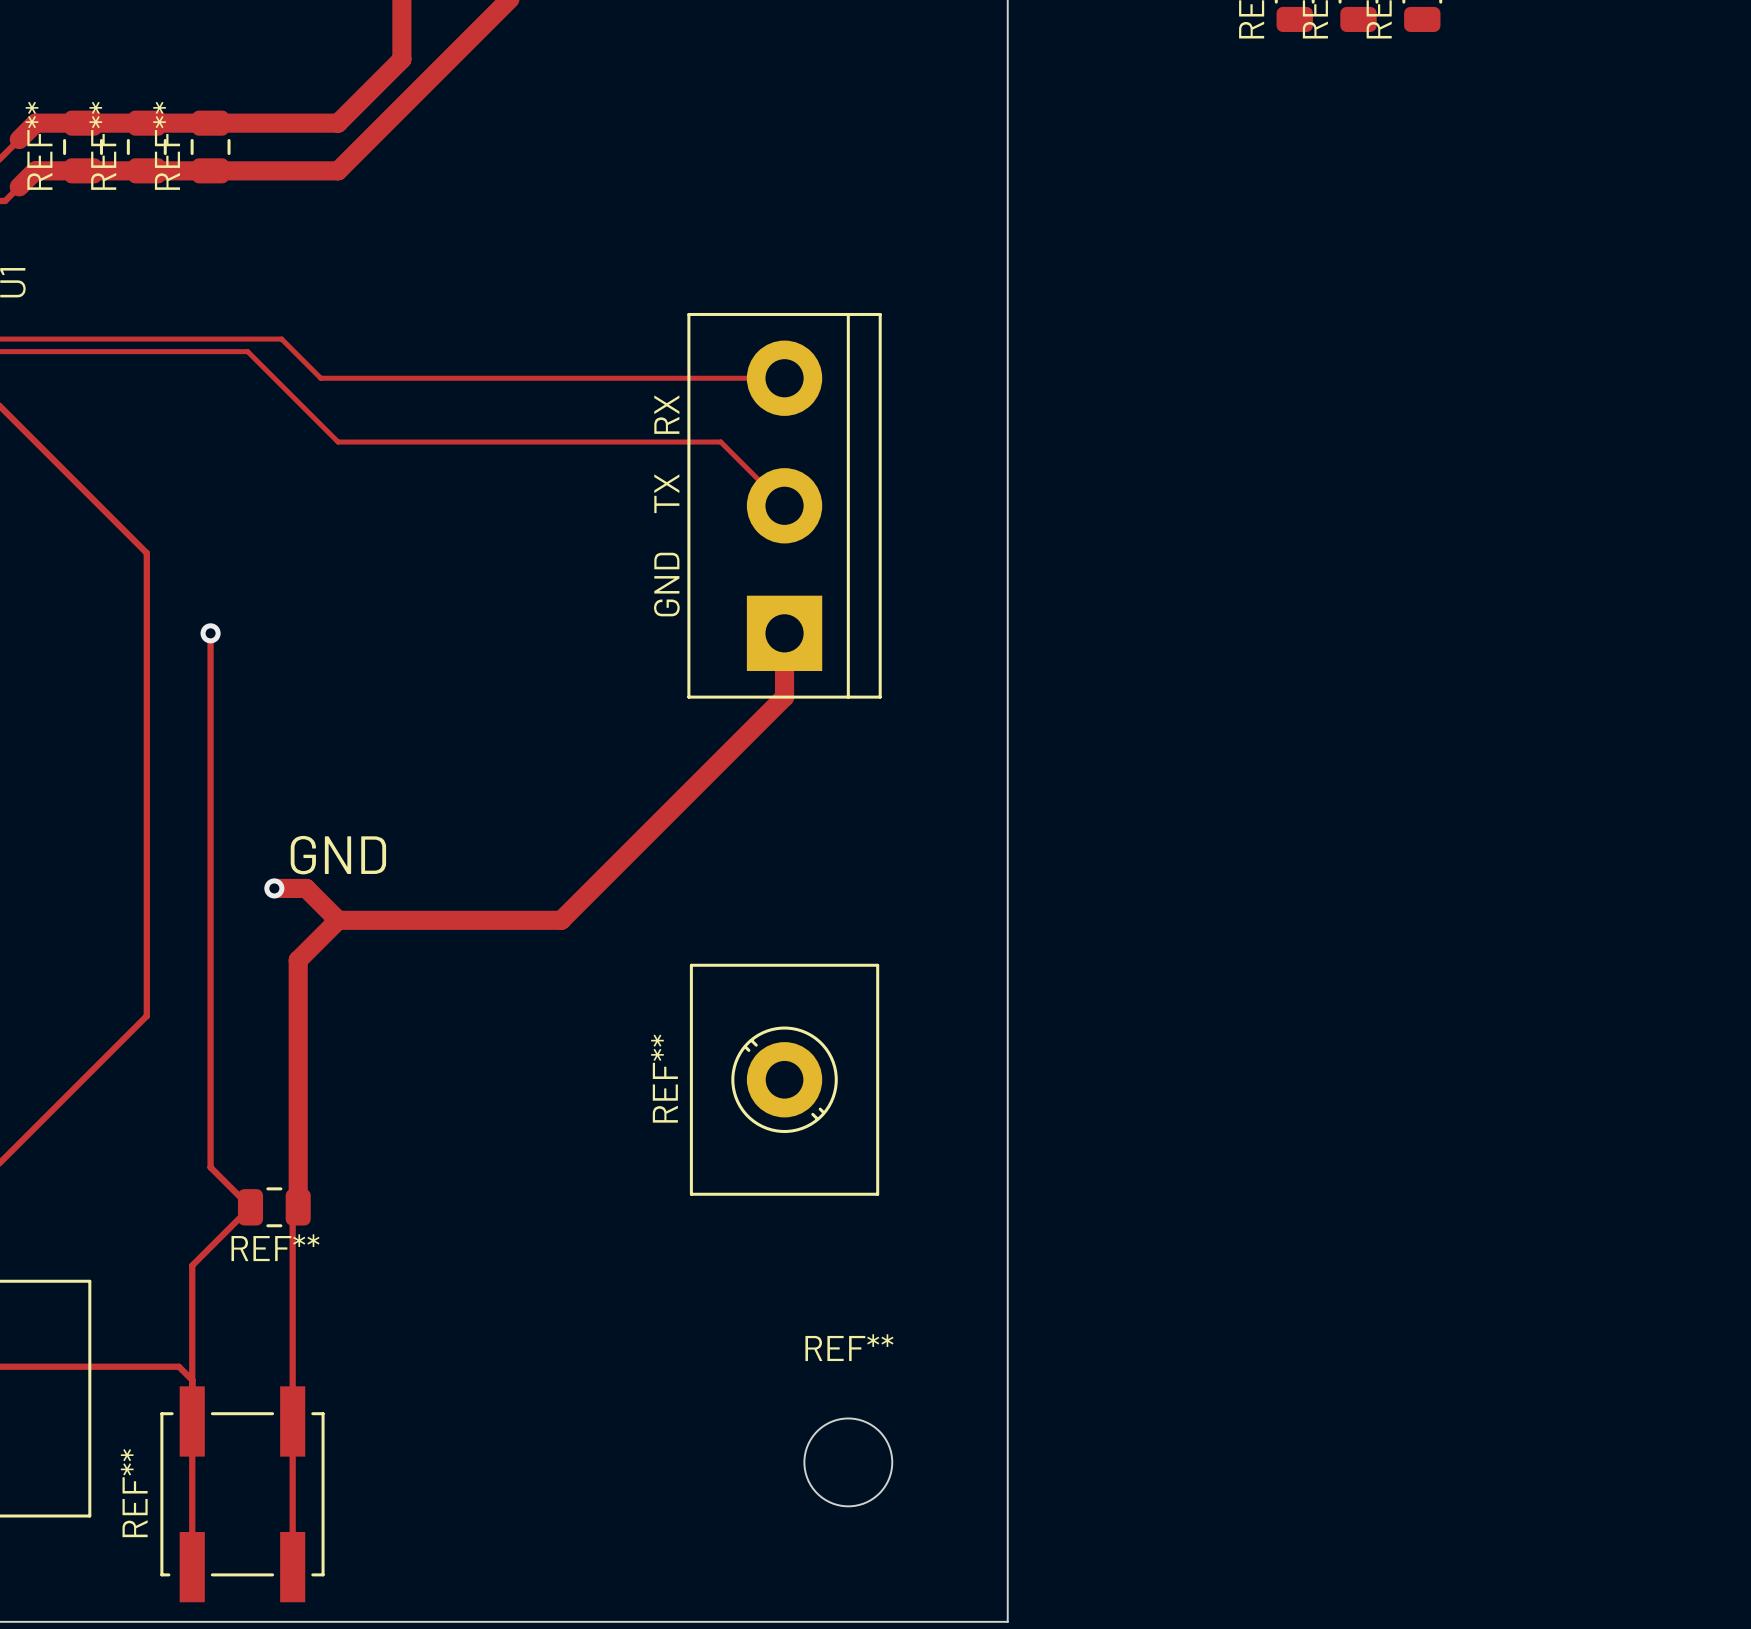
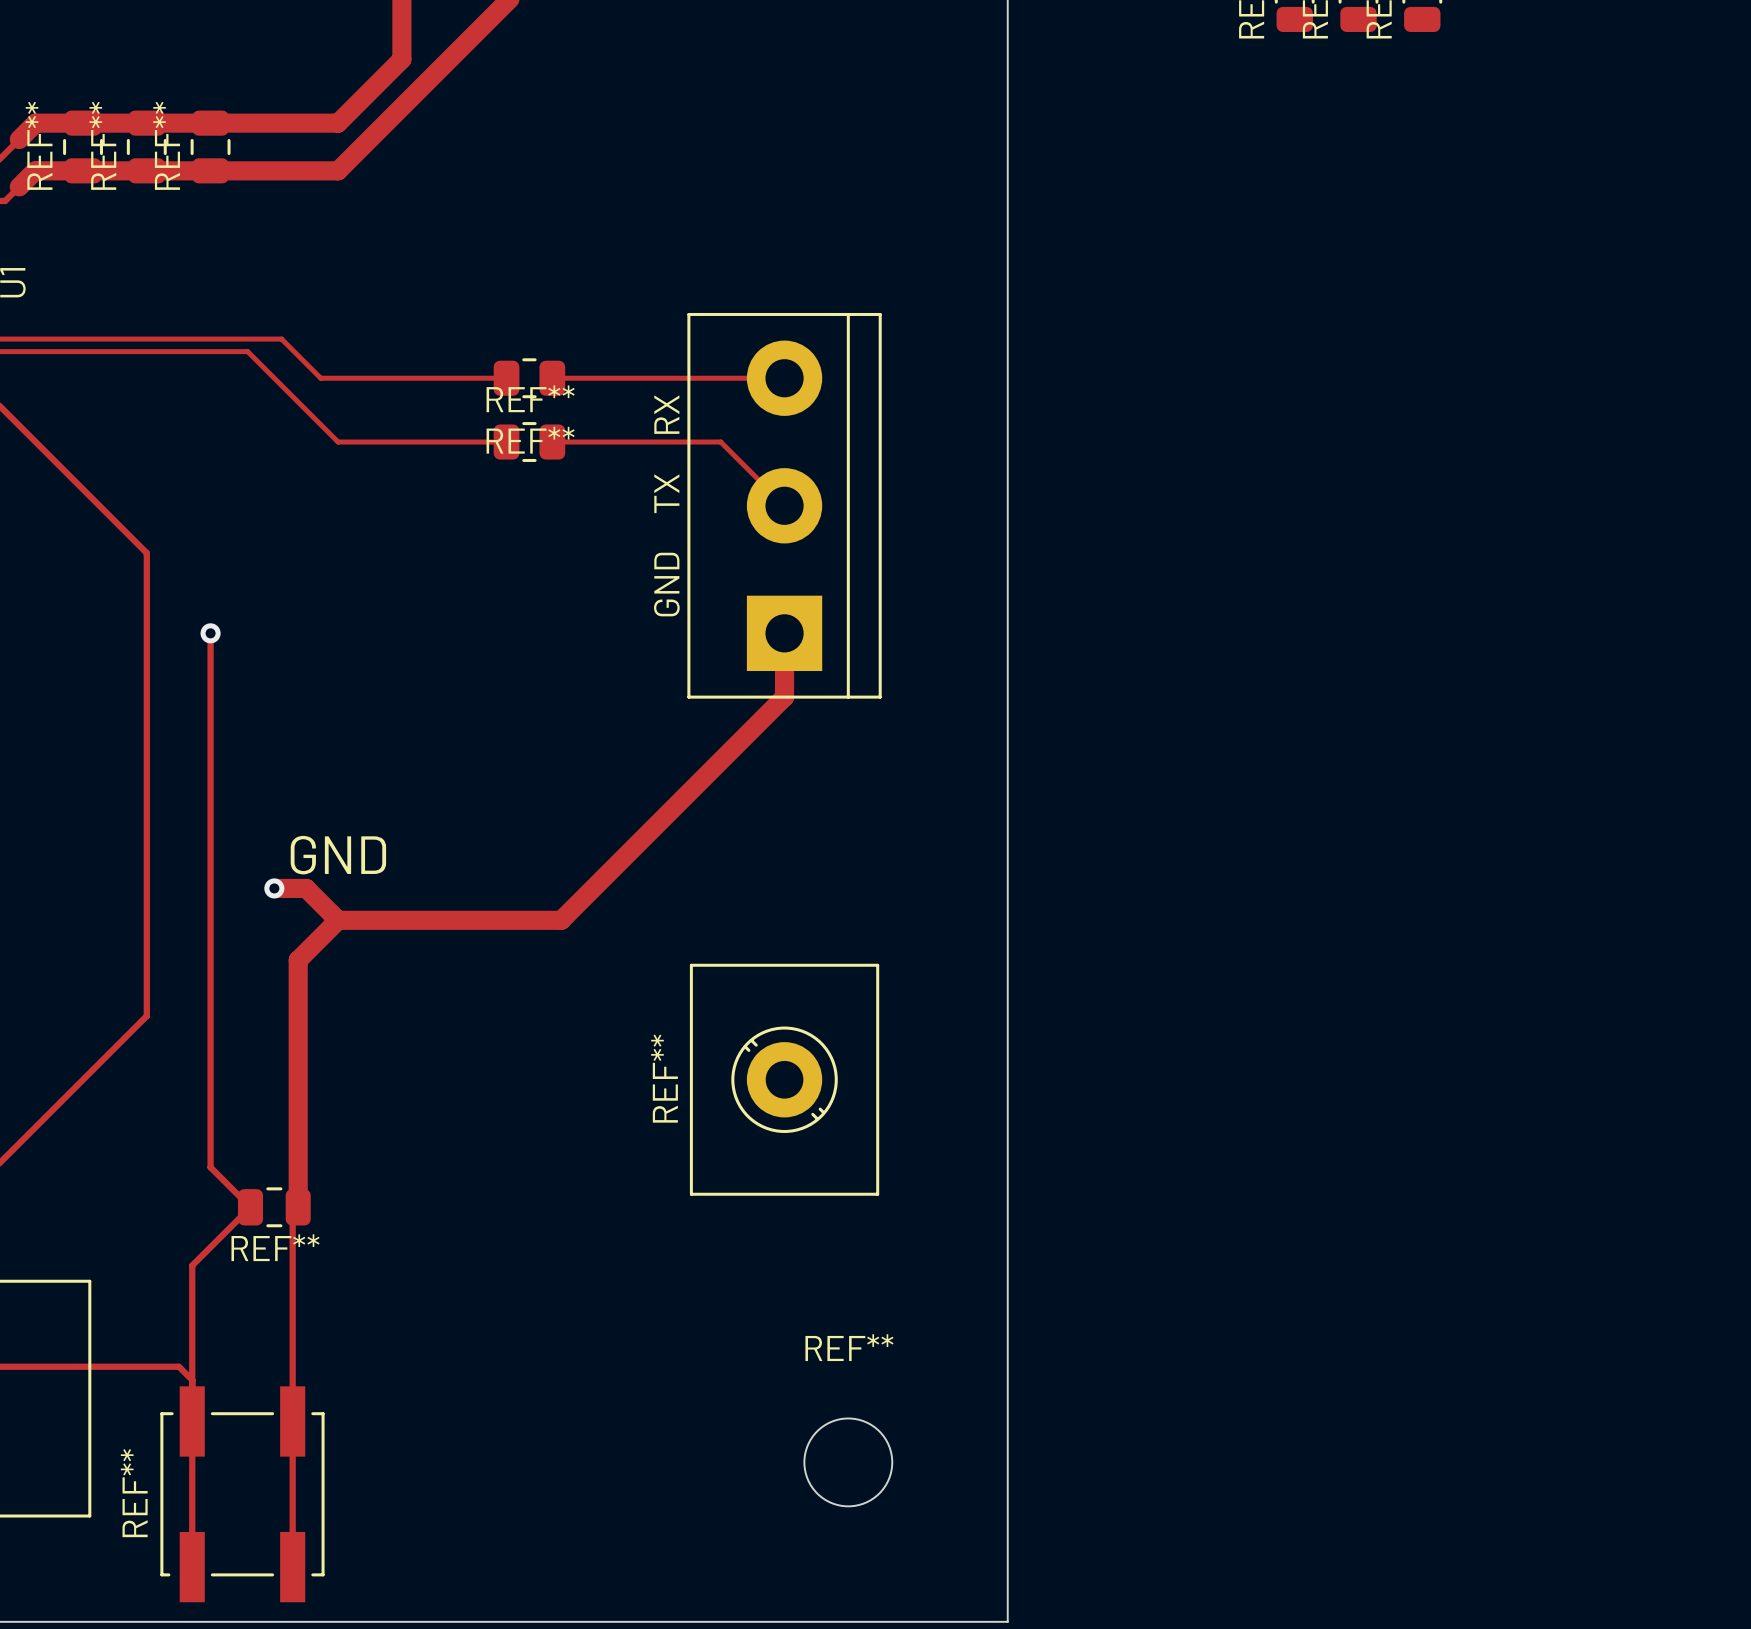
track: (506, 378) (552, 378) -> none
REF**: none -> (529, 378)
track: (506, 442) (552, 442) -> none
REF**: none -> (529, 442)

